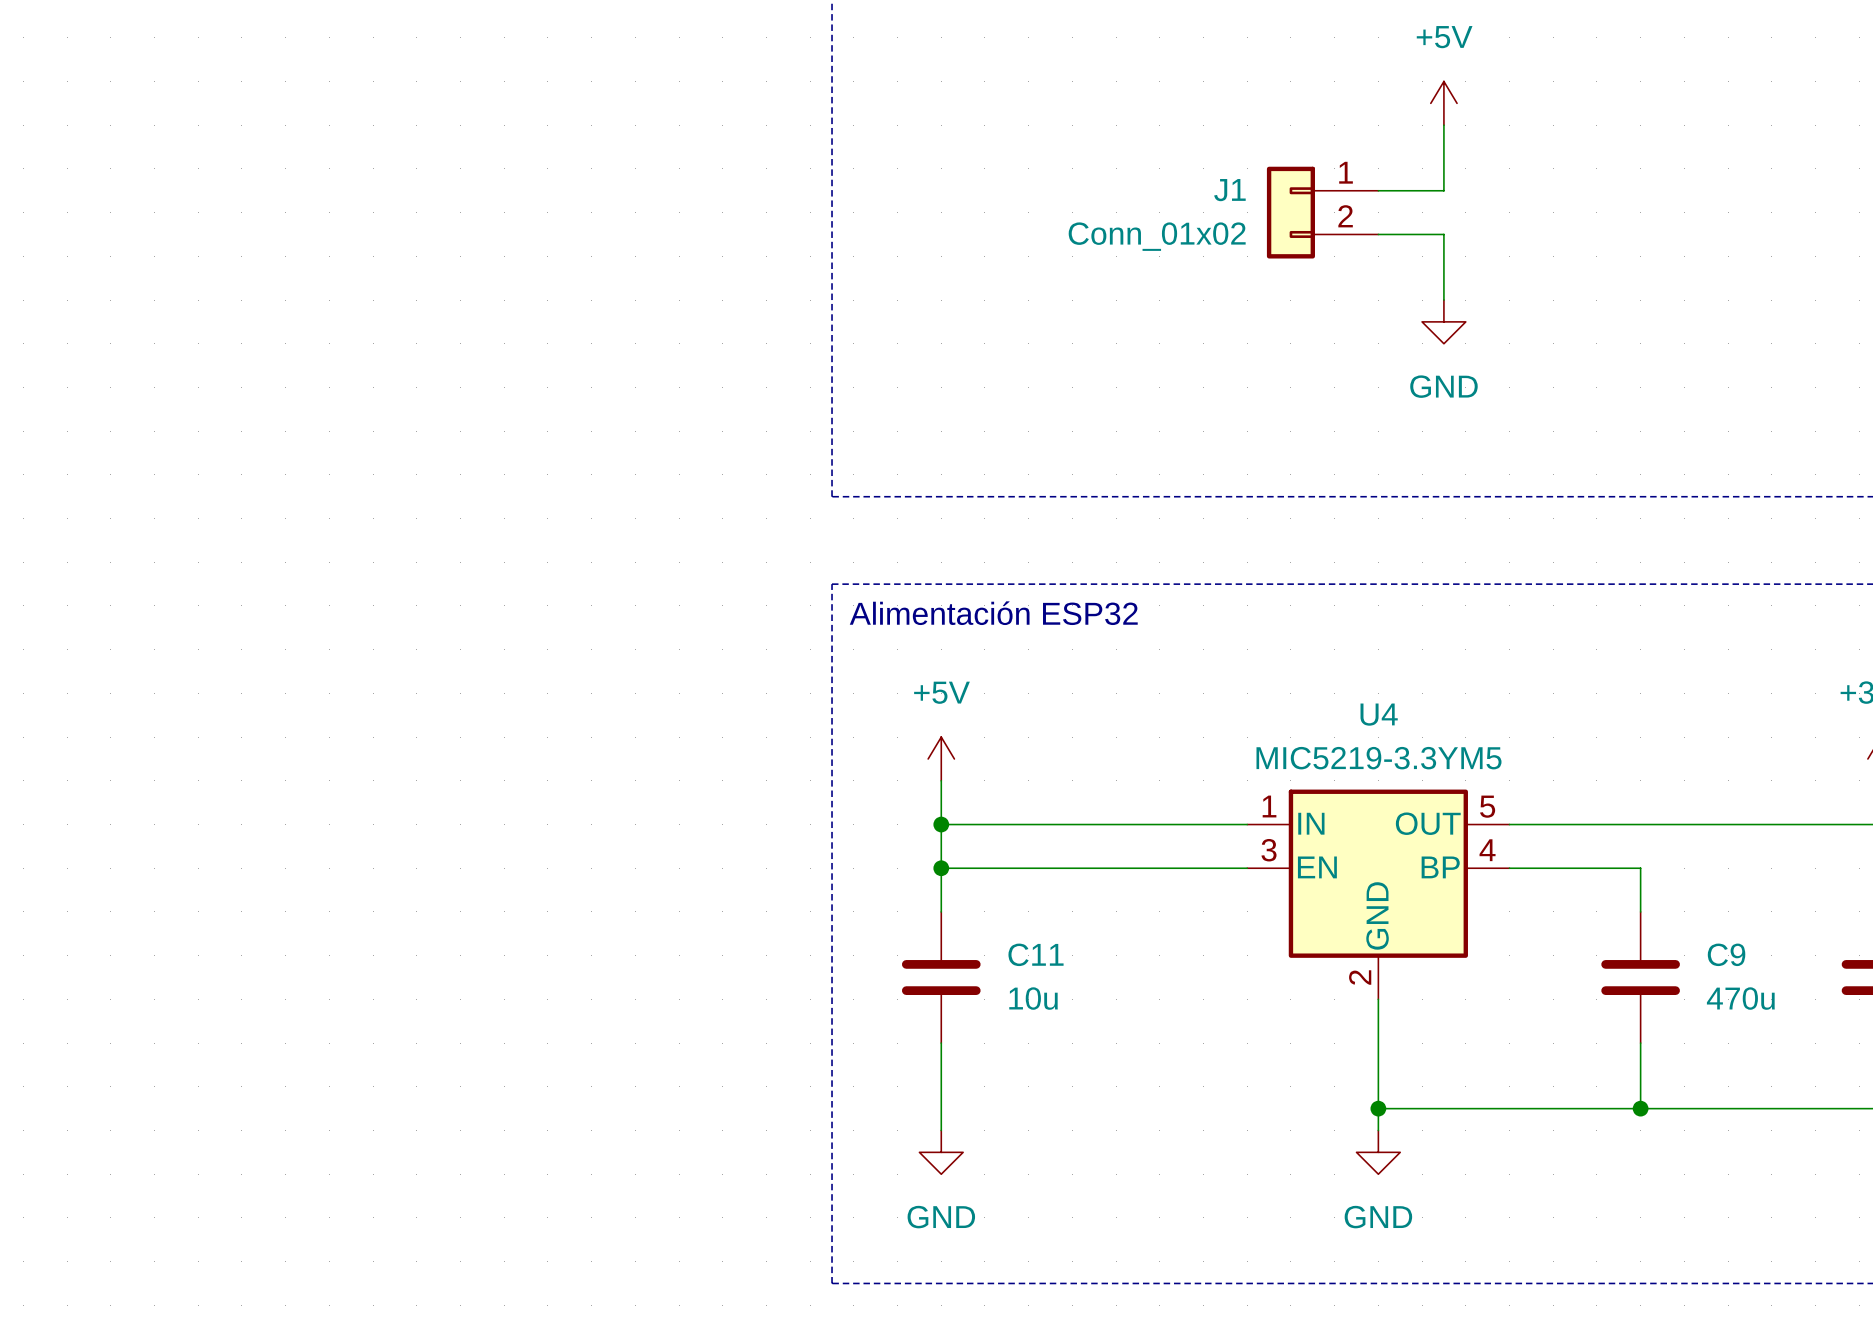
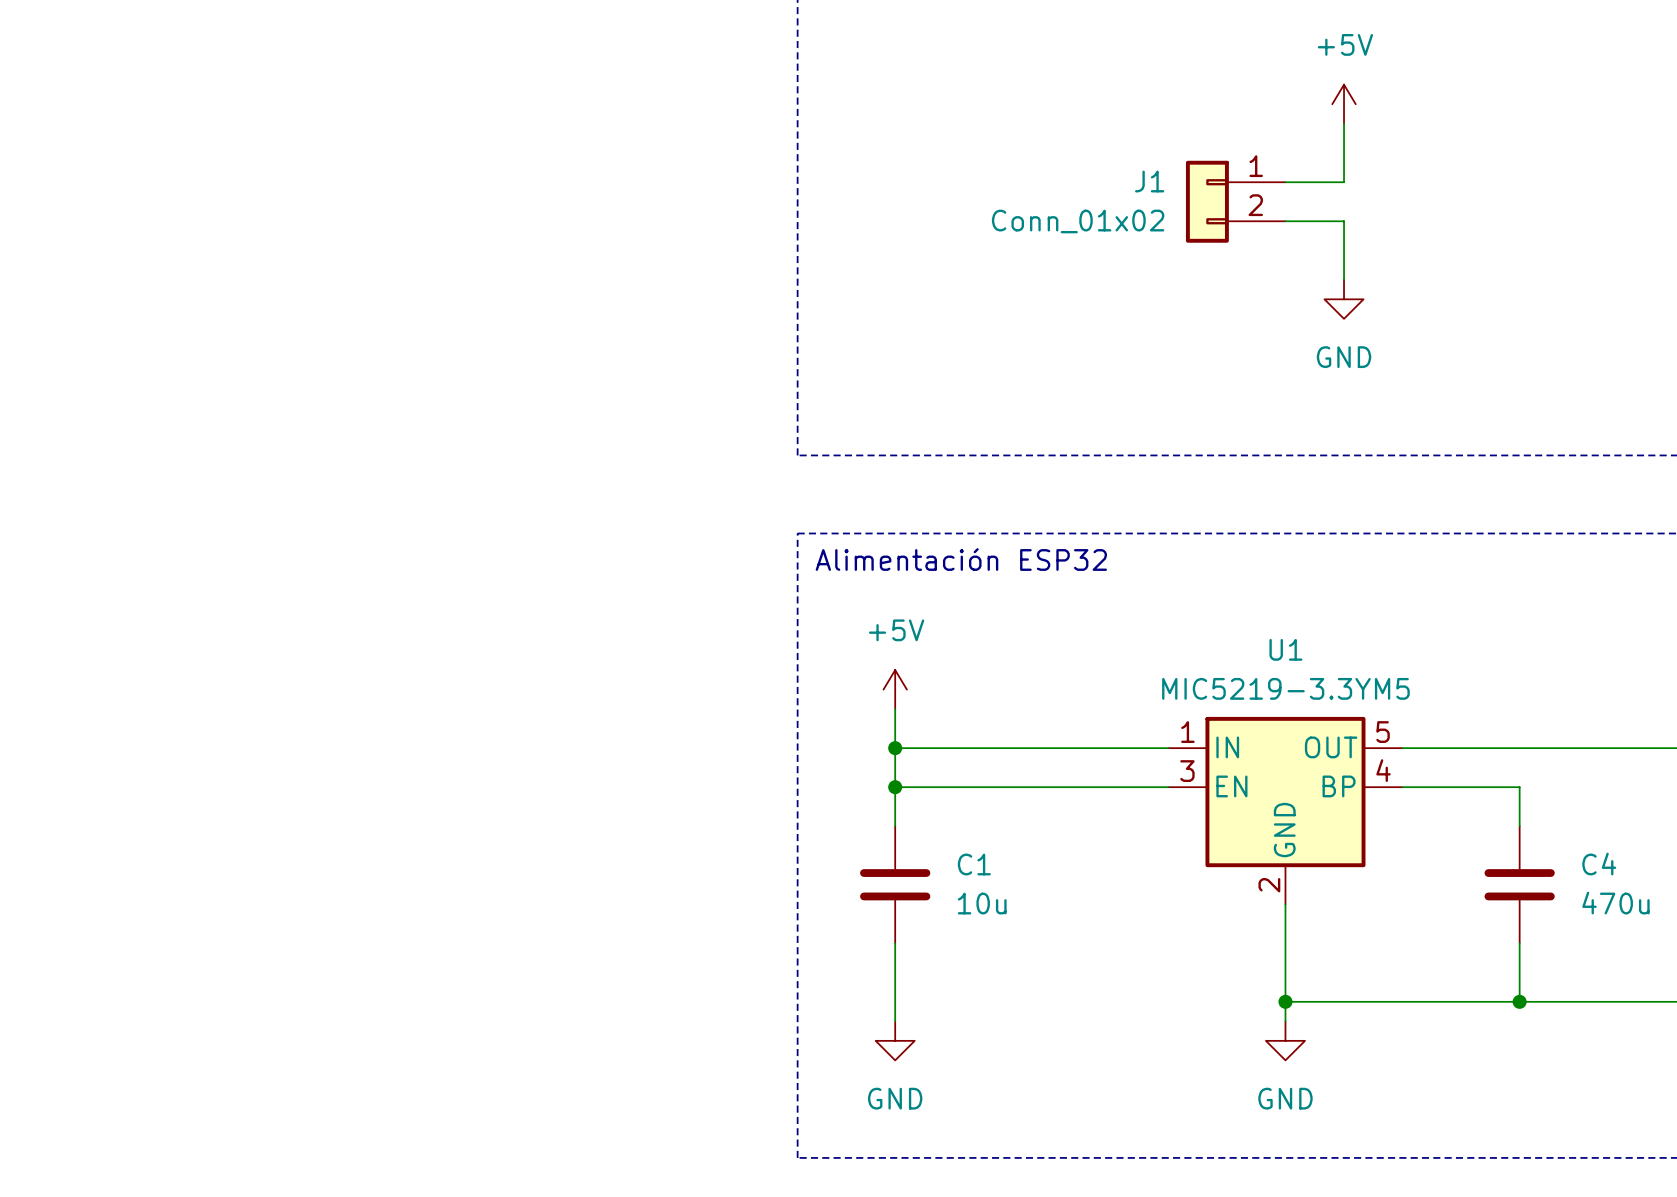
U4 name: U4 (1379, 714) -> U1 (1285, 649)
C11 name: C11 (1036, 954) -> C1 (974, 864)
C9 name: C9 (1726, 954) -> C4 (1599, 864)

